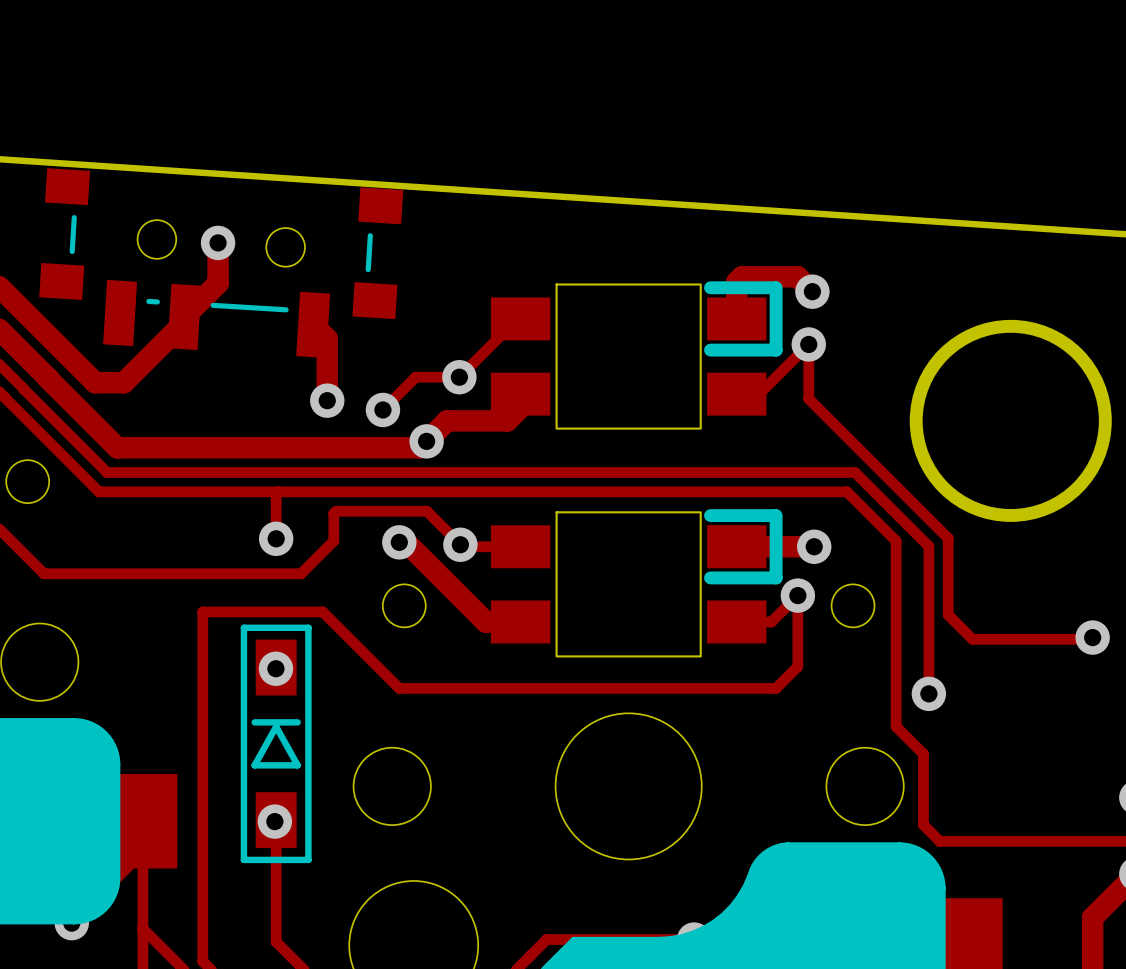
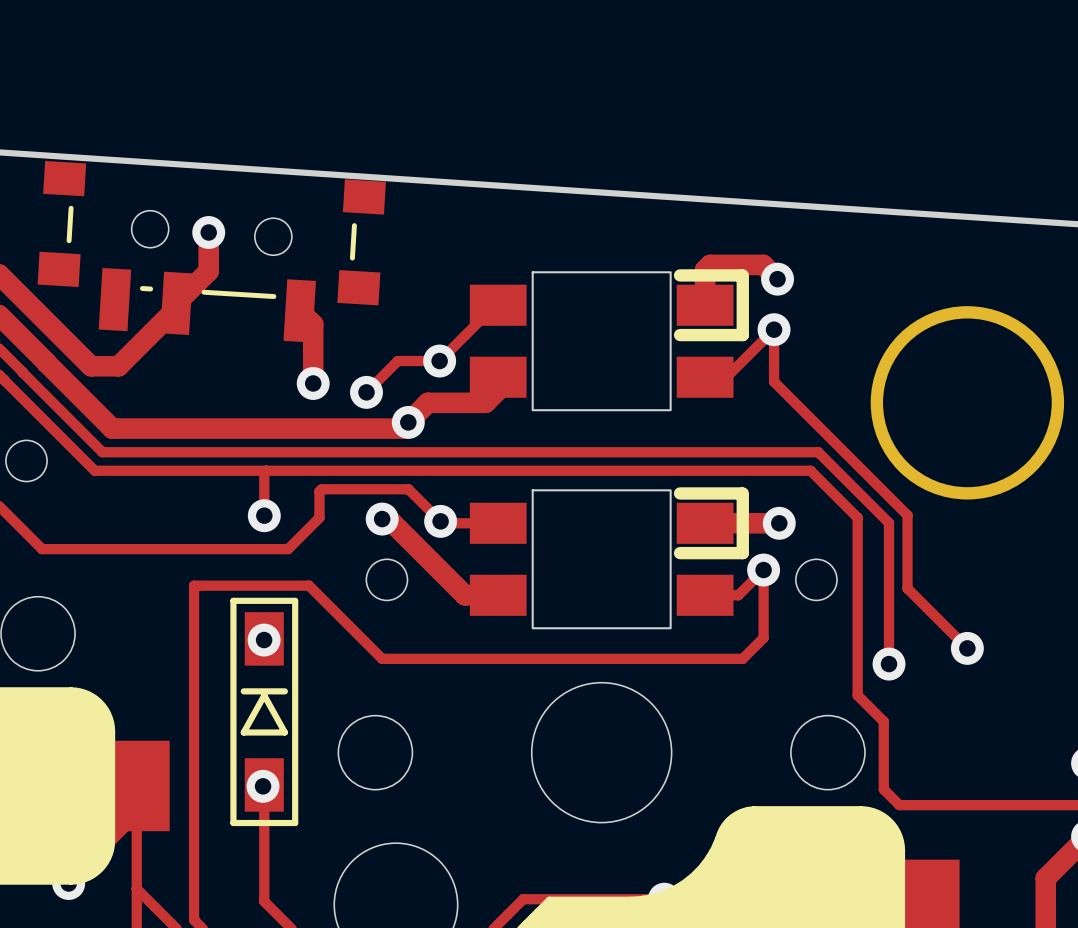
track: (1092, 637) (1090, 639) (972, 639) -> (967, 648) (930, 611)
via position: (1092, 637) -> (967, 648)

